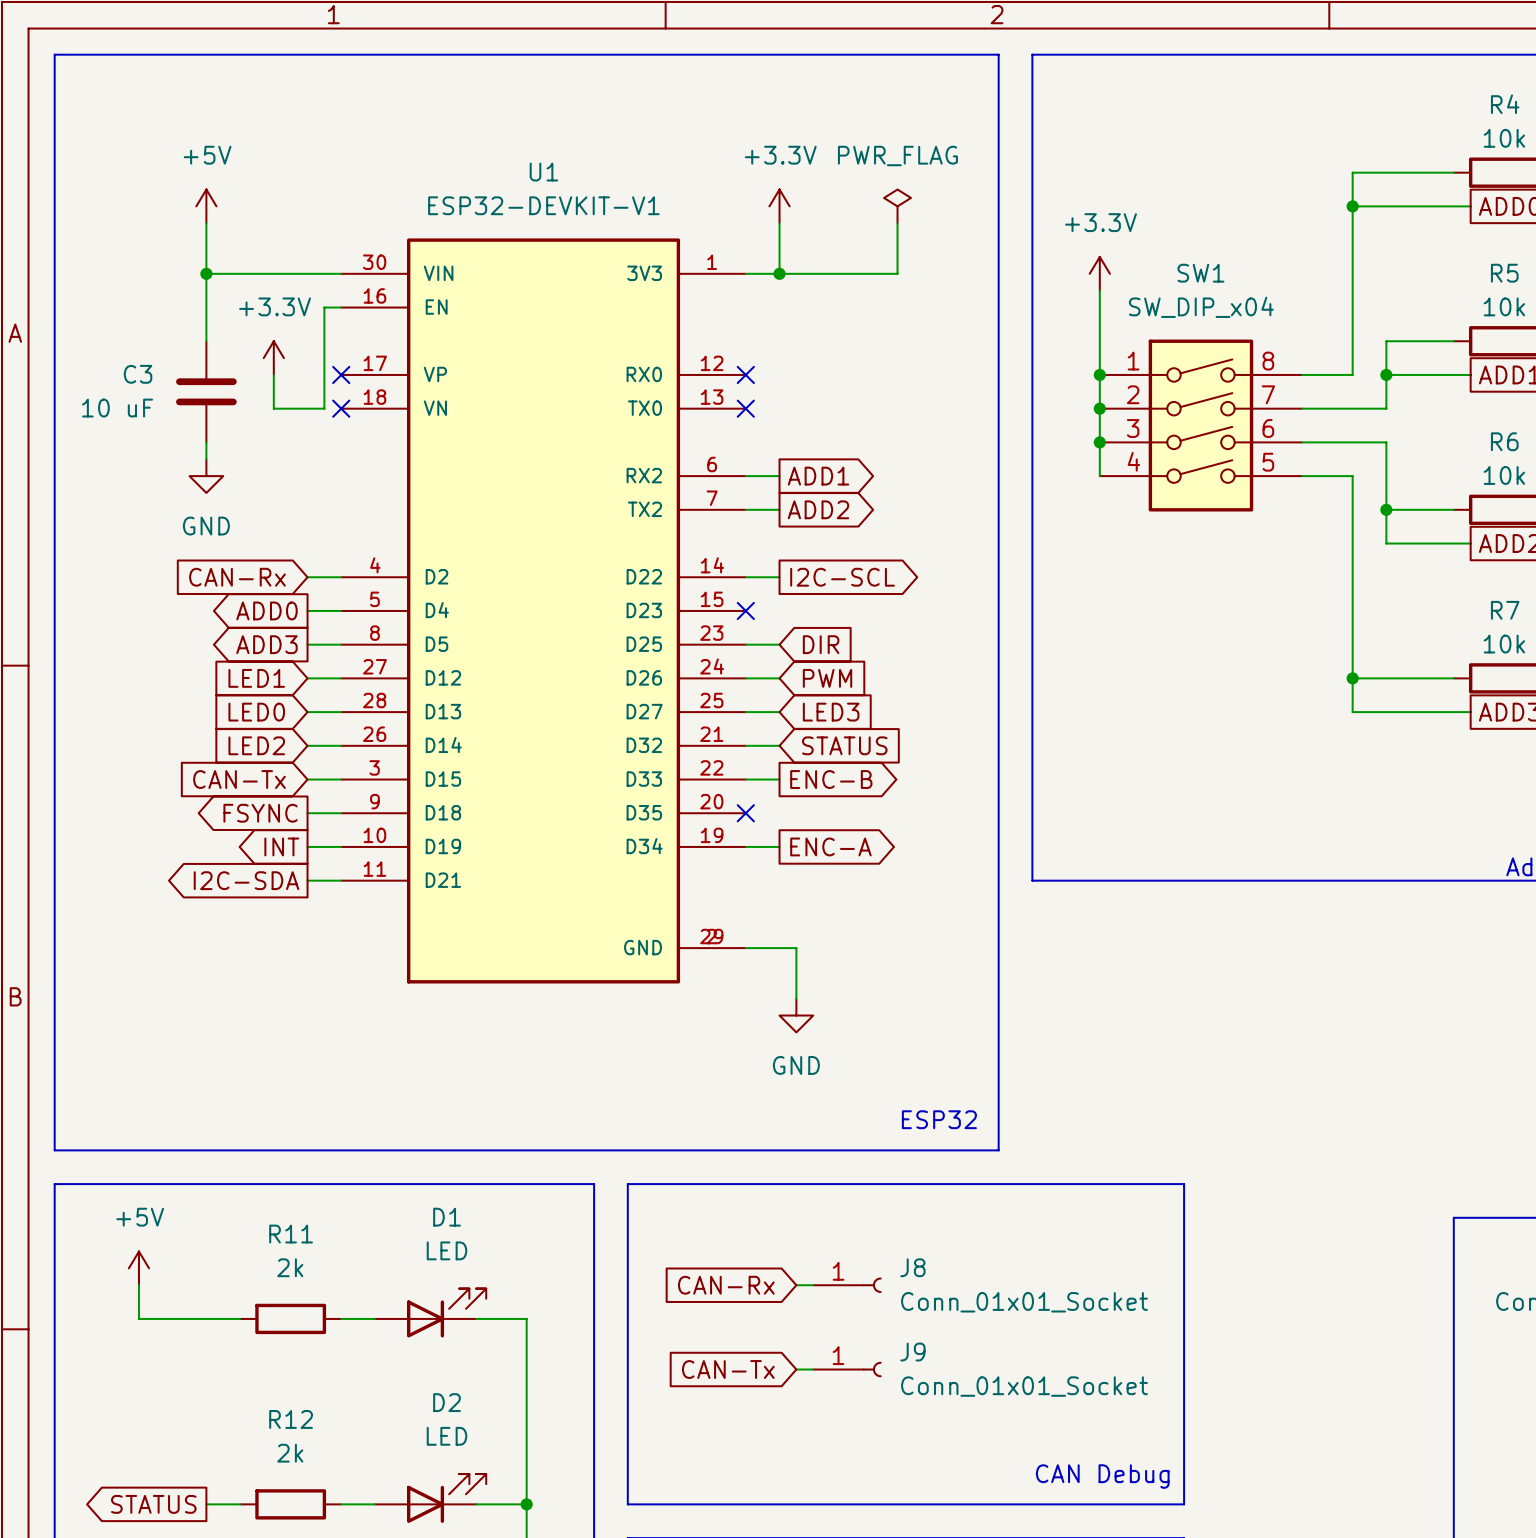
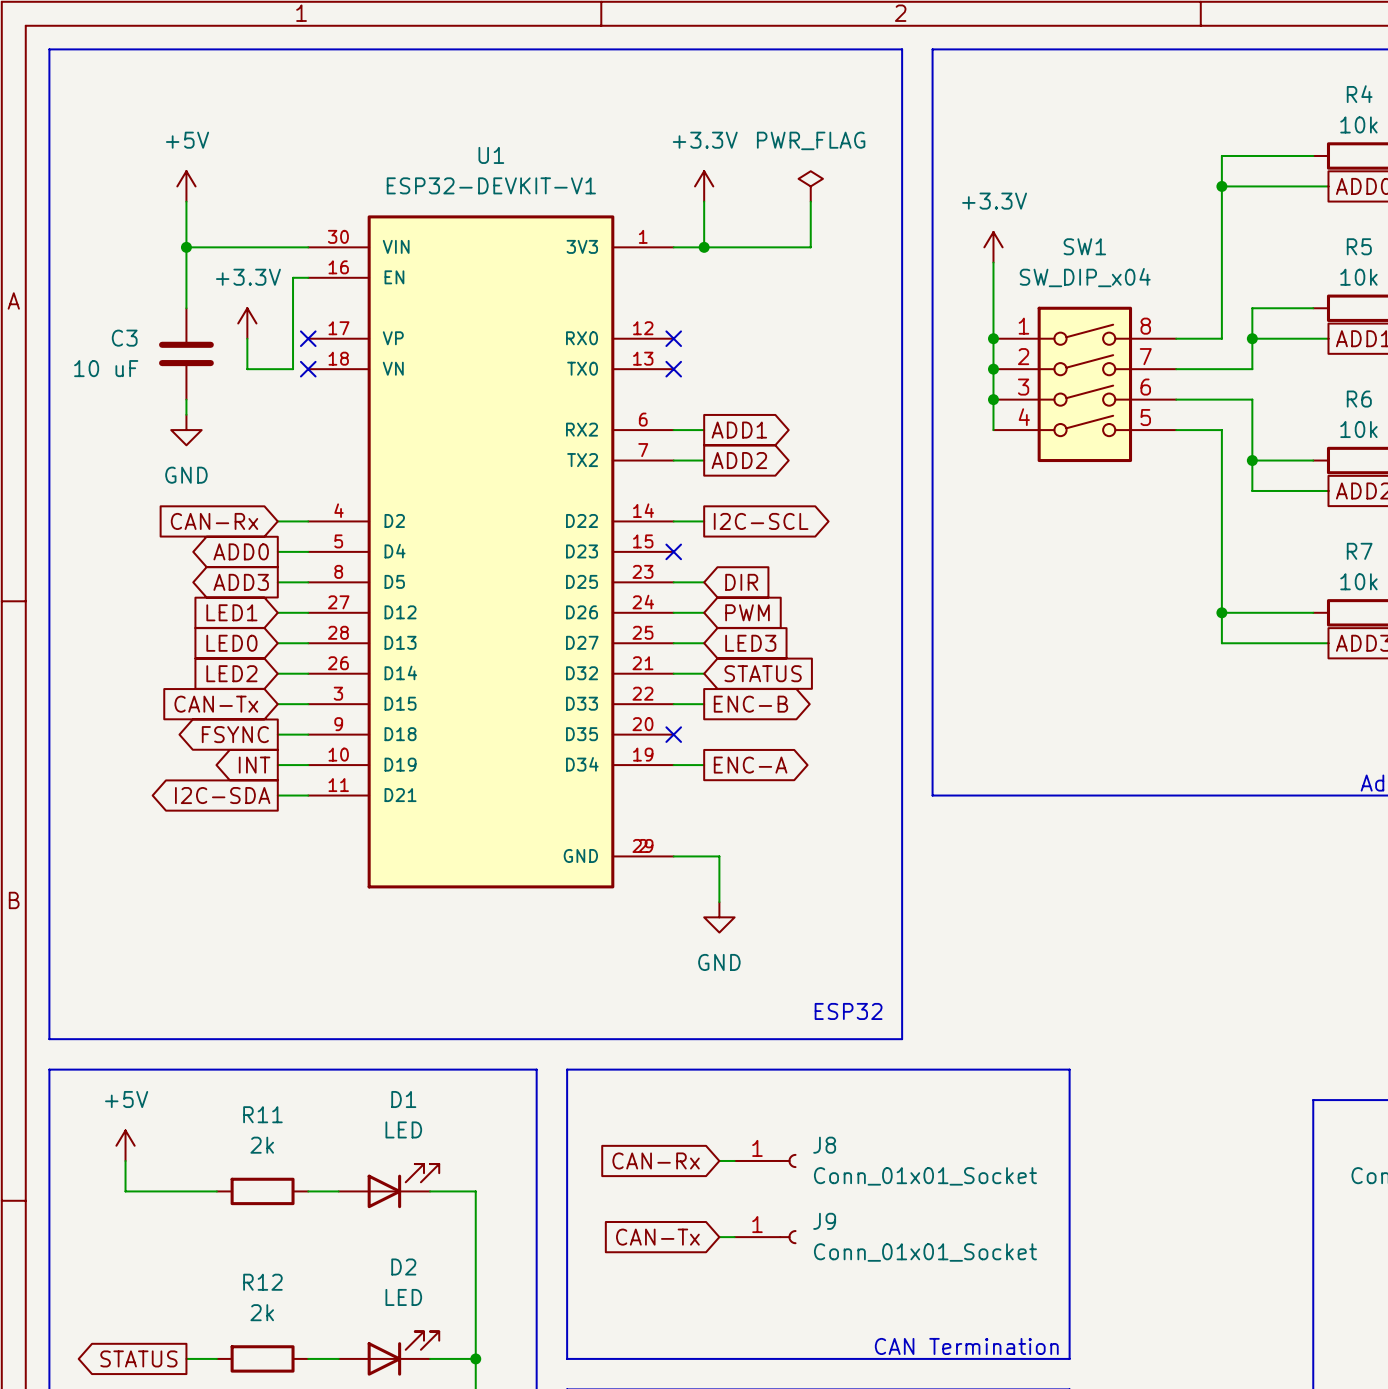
text: CAN Debug (1102, 1476) -> none
text: none -> CAN Termination (966, 1346)

